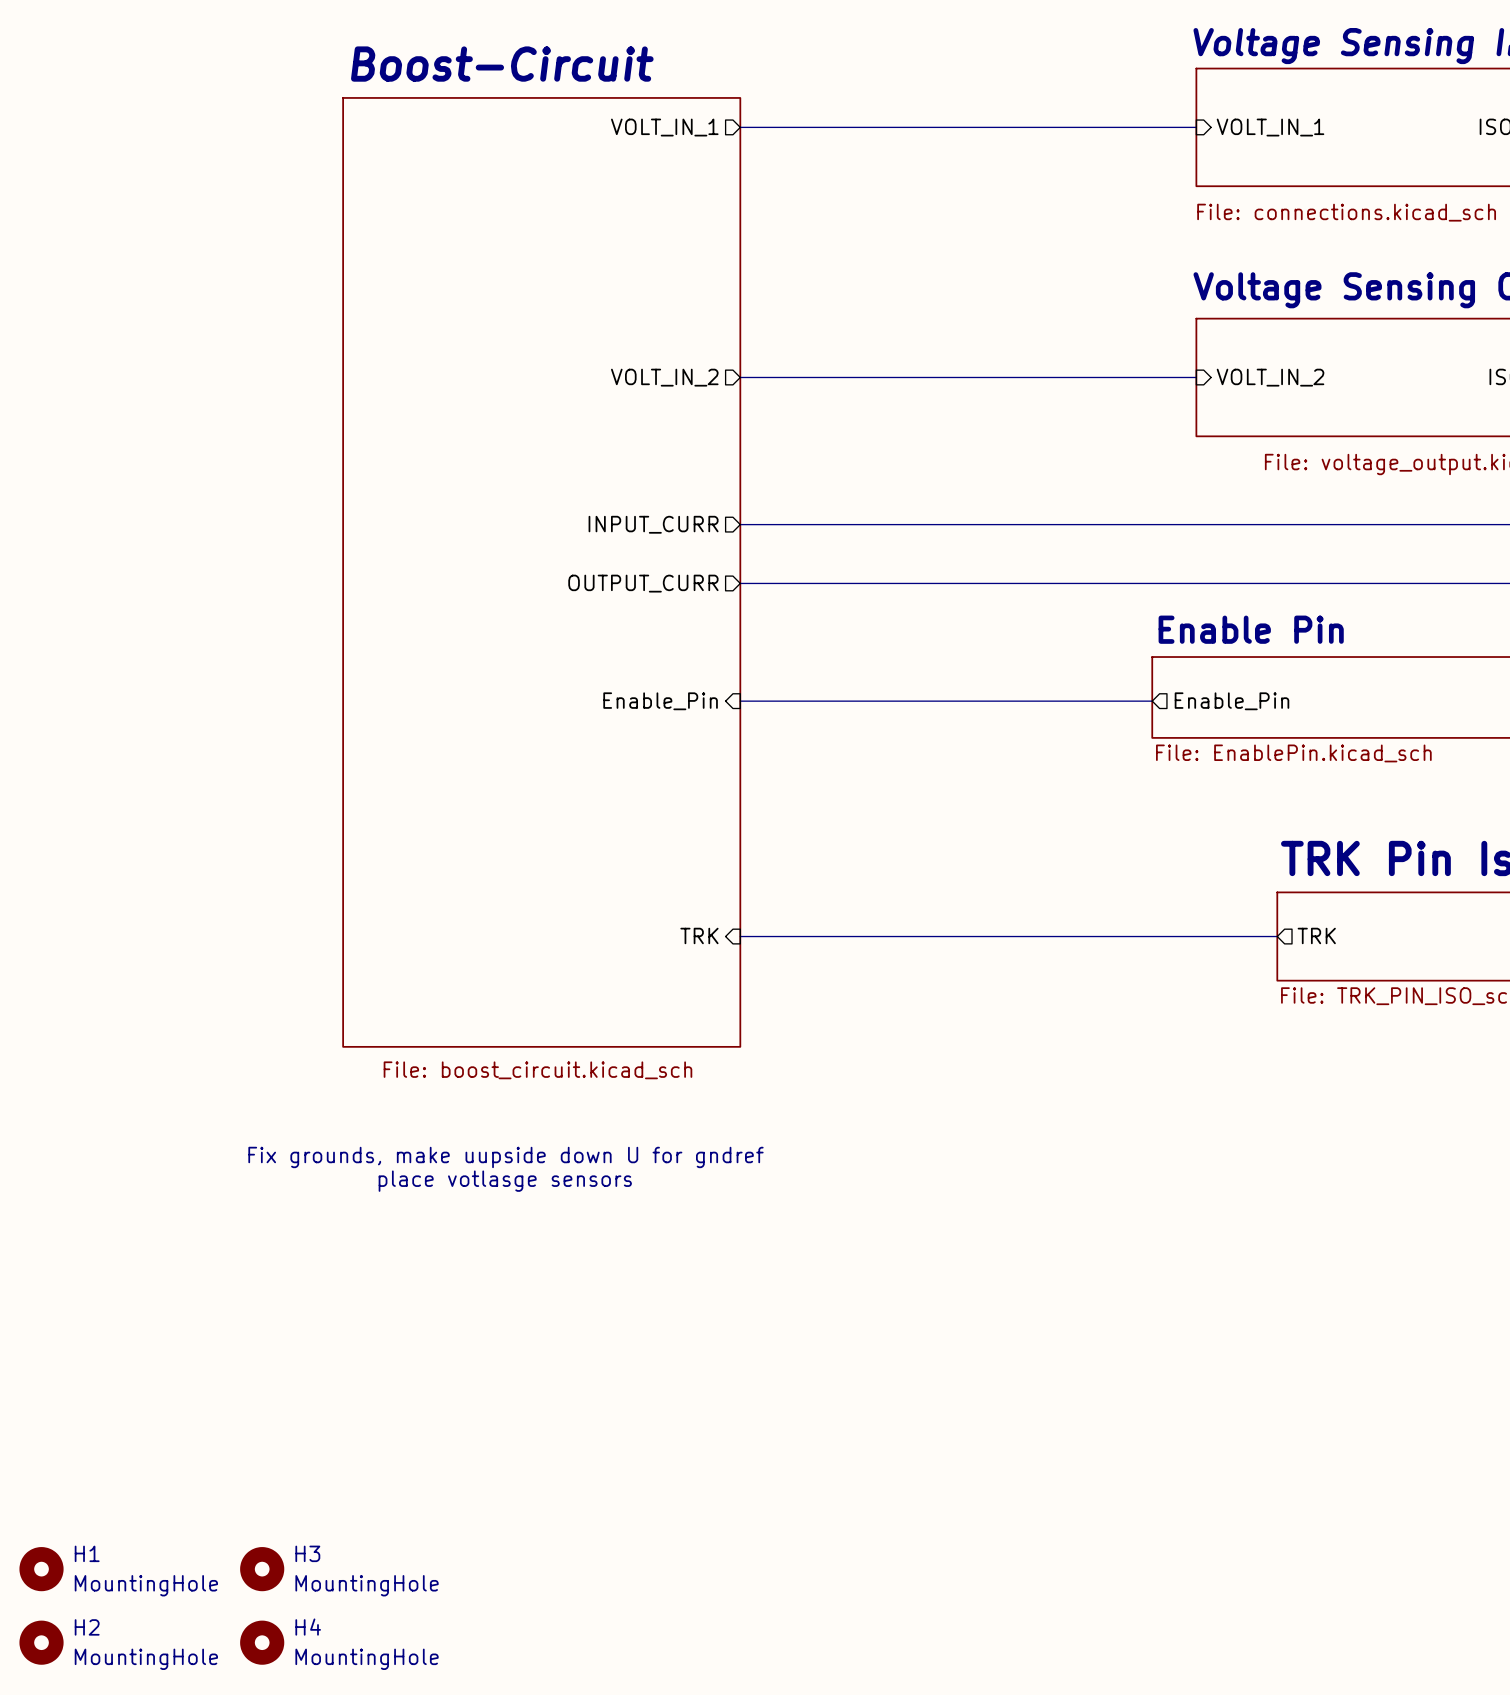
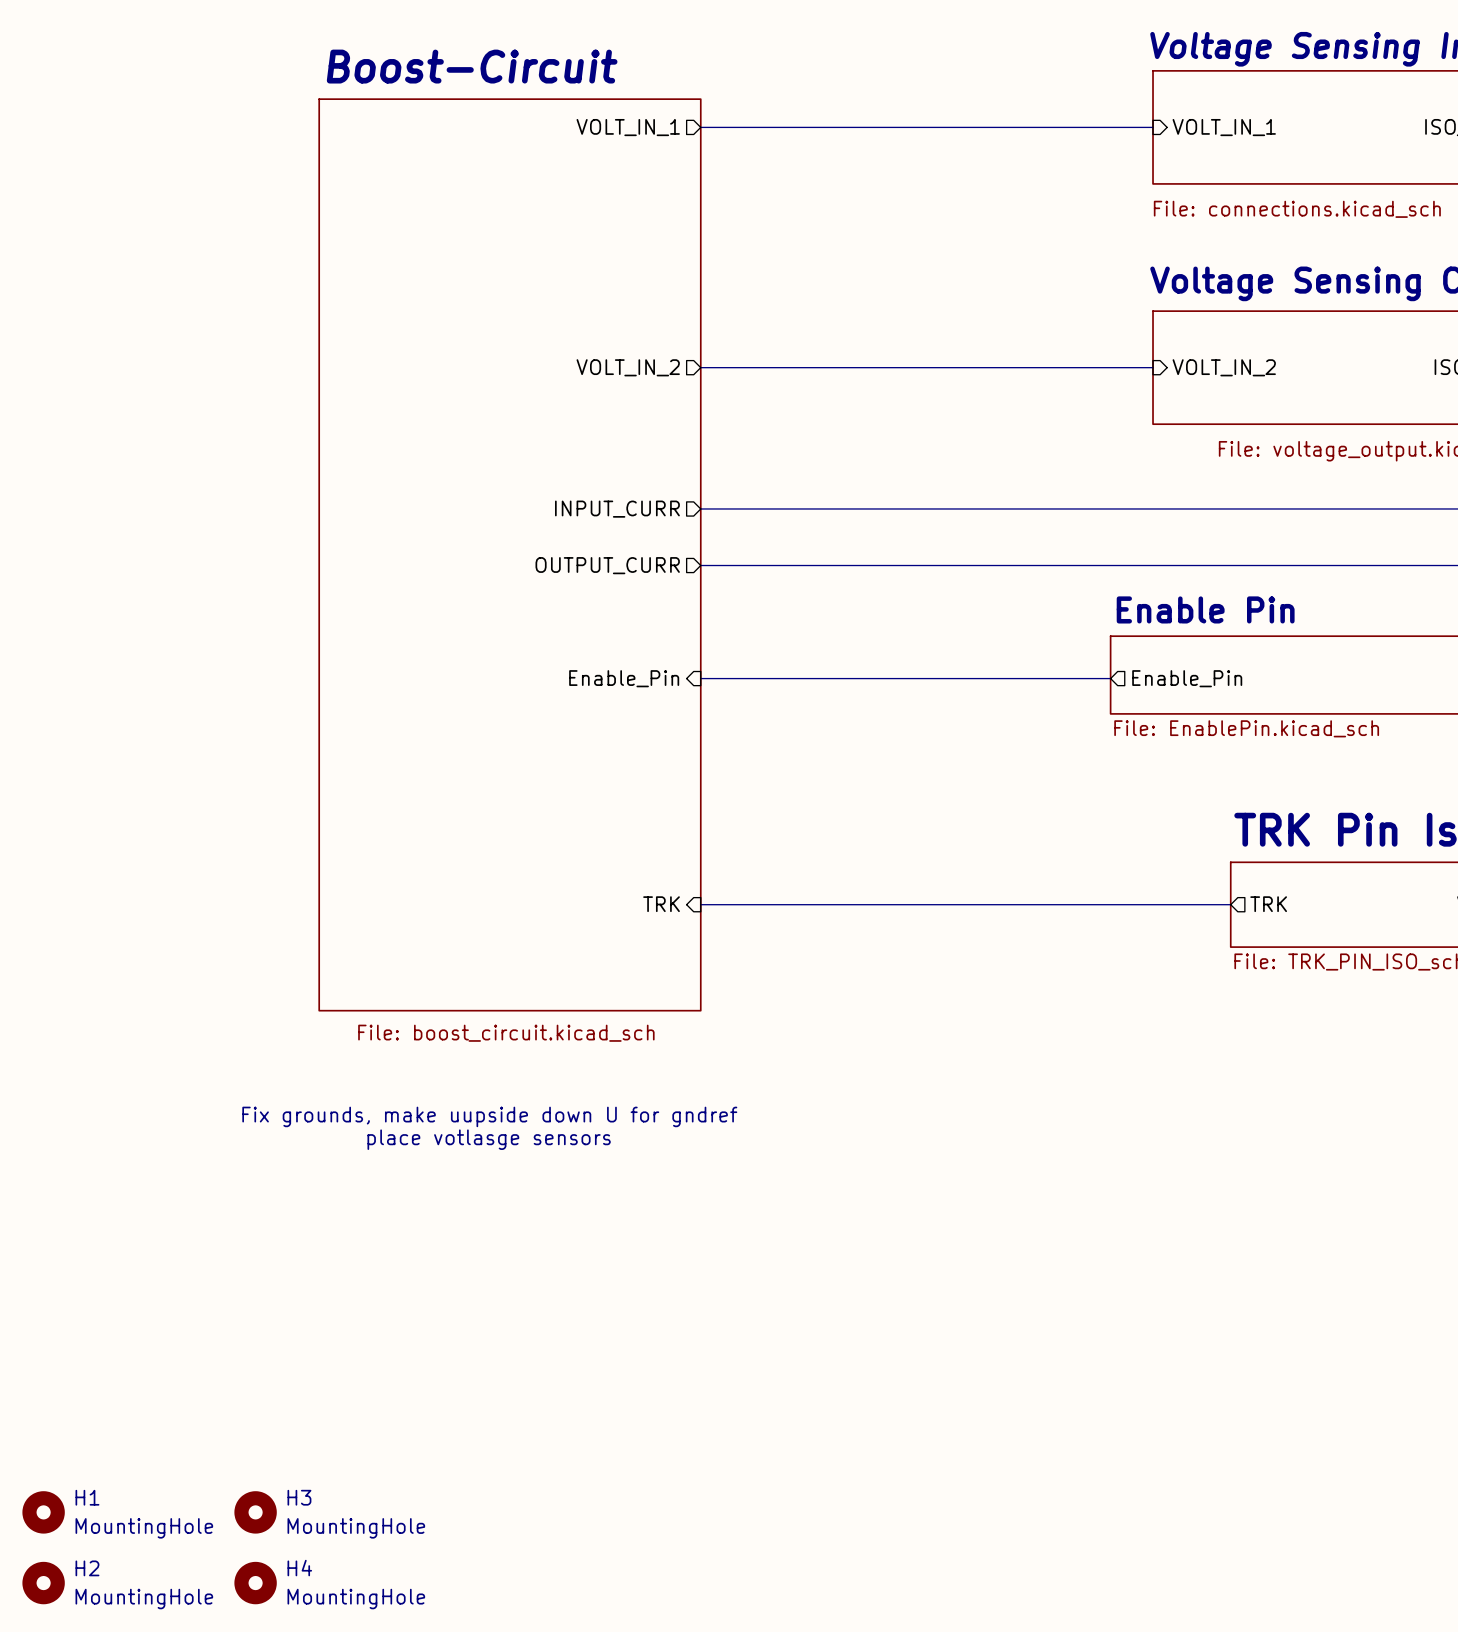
sheet pin position: VOLT_IN_1 (664, 127) -> VOLT_IN_1 (628, 127)
wire: none -> (700, 127) (714, 127)
sheet pin position: VOLT_IN_2 (664, 377) -> VOLT_IN_2 (628, 367)
wire: none -> (700, 367) (714, 367)
sheet pin position: INPUT_CURR (653, 524) -> INPUT_CURR (617, 509)
wire: none -> (700, 508) (714, 508)
sheet Boost-Circuit position: (541, 572) -> (509, 554)
sheet pin position: OUTPUT_CURR (643, 583) -> OUTPUT_CURR (607, 565)
wire: none -> (700, 565) (714, 565)
sheet pin position: Enable_Pin (660, 701) -> Enable_Pin (624, 678)
wire: none -> (700, 678) (714, 678)
sheet pin position: TRK (699, 935) -> TRK (661, 904)
wire: none -> (700, 904) (714, 904)

